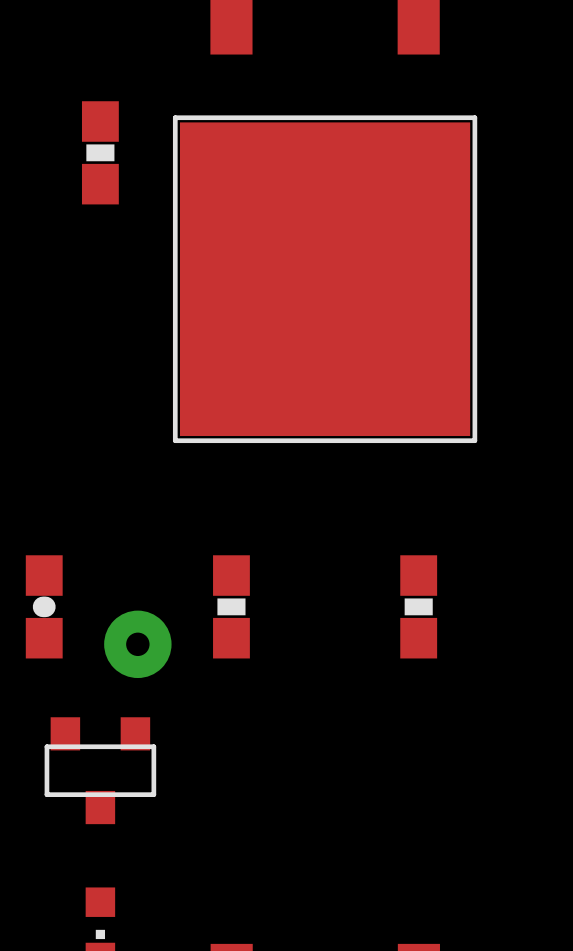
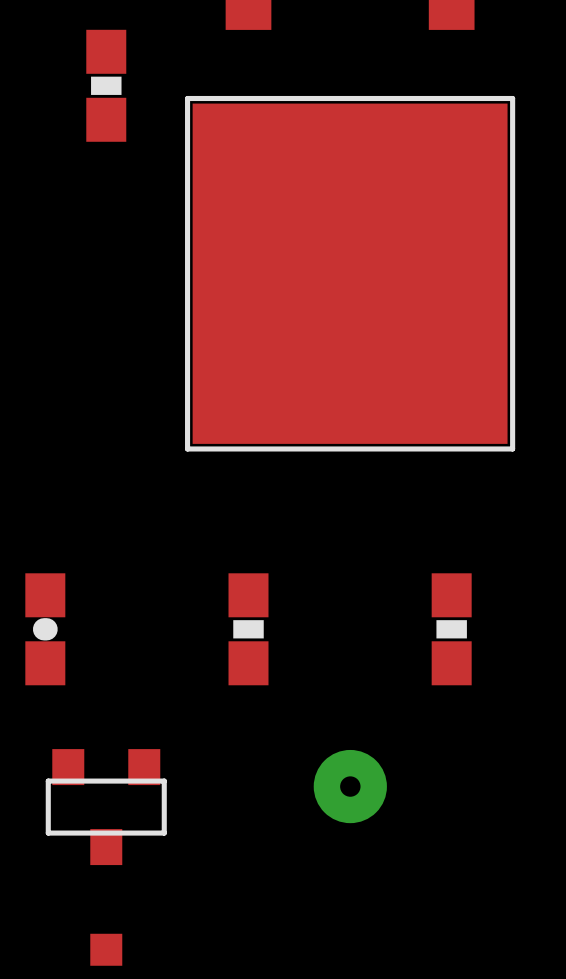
part position: (100, 152) -> (106, 85)
part: (137, 644) -> none
part: none -> (350, 786)

